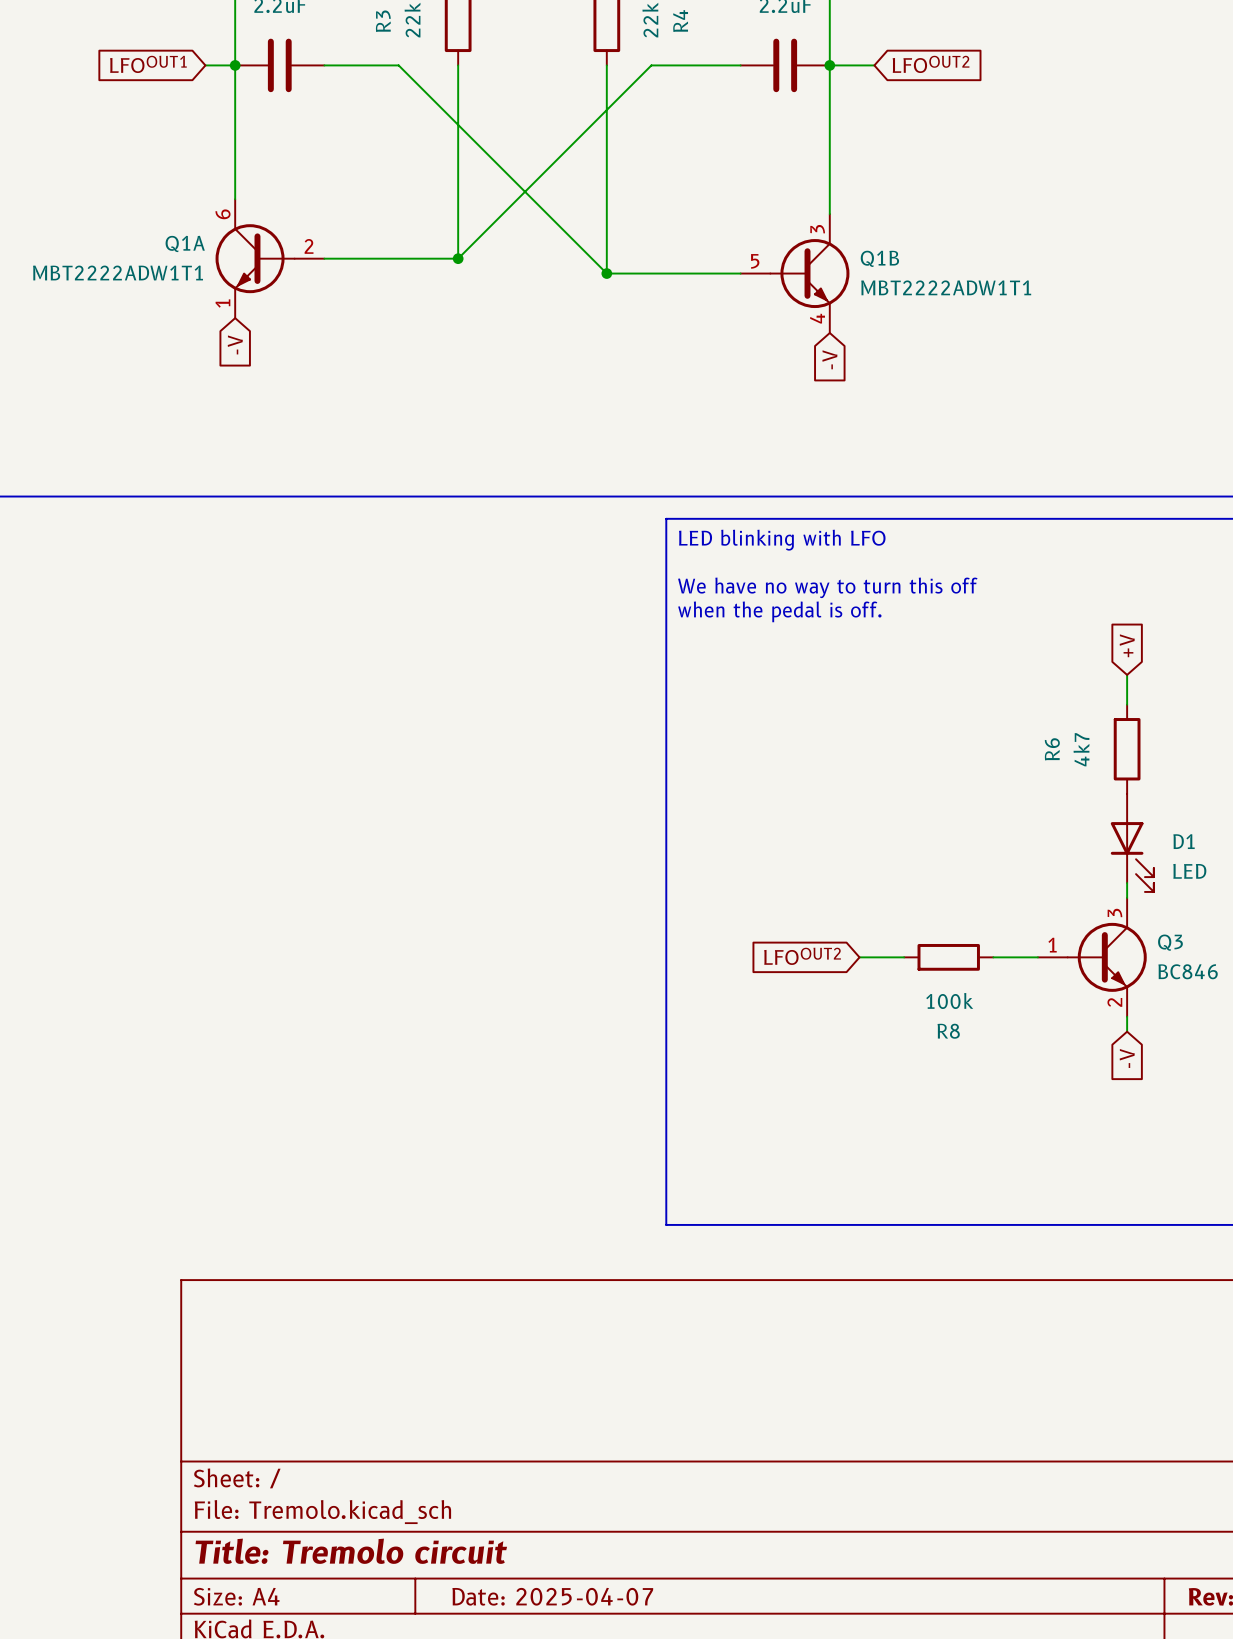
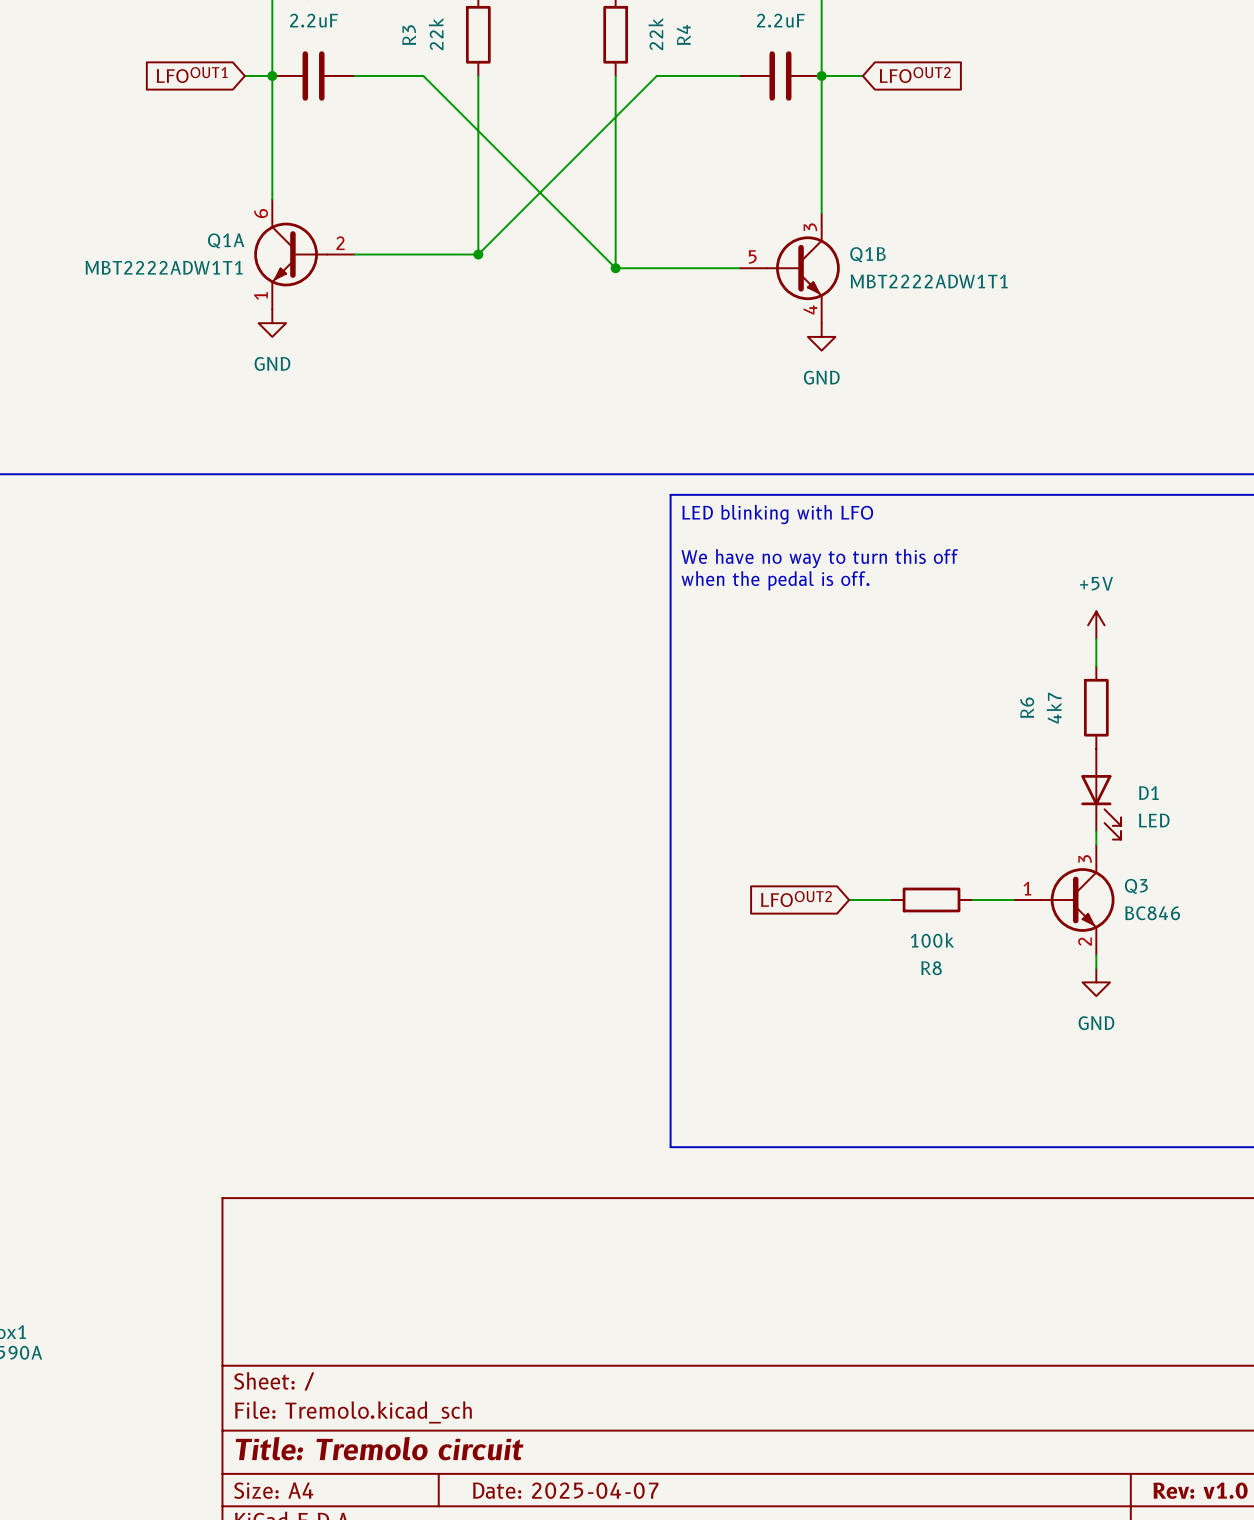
power symbol: none -> GND (272, 323)
global label: -V (235, 344) -> none
power symbol: none -> GND (821, 336)
global label: -V (829, 359) -> none
global label: +V (1127, 645) -> none
power symbol: none -> +5V (1096, 625)
power symbol: none -> GND (1096, 982)
global label: -V (1127, 1058) -> none

